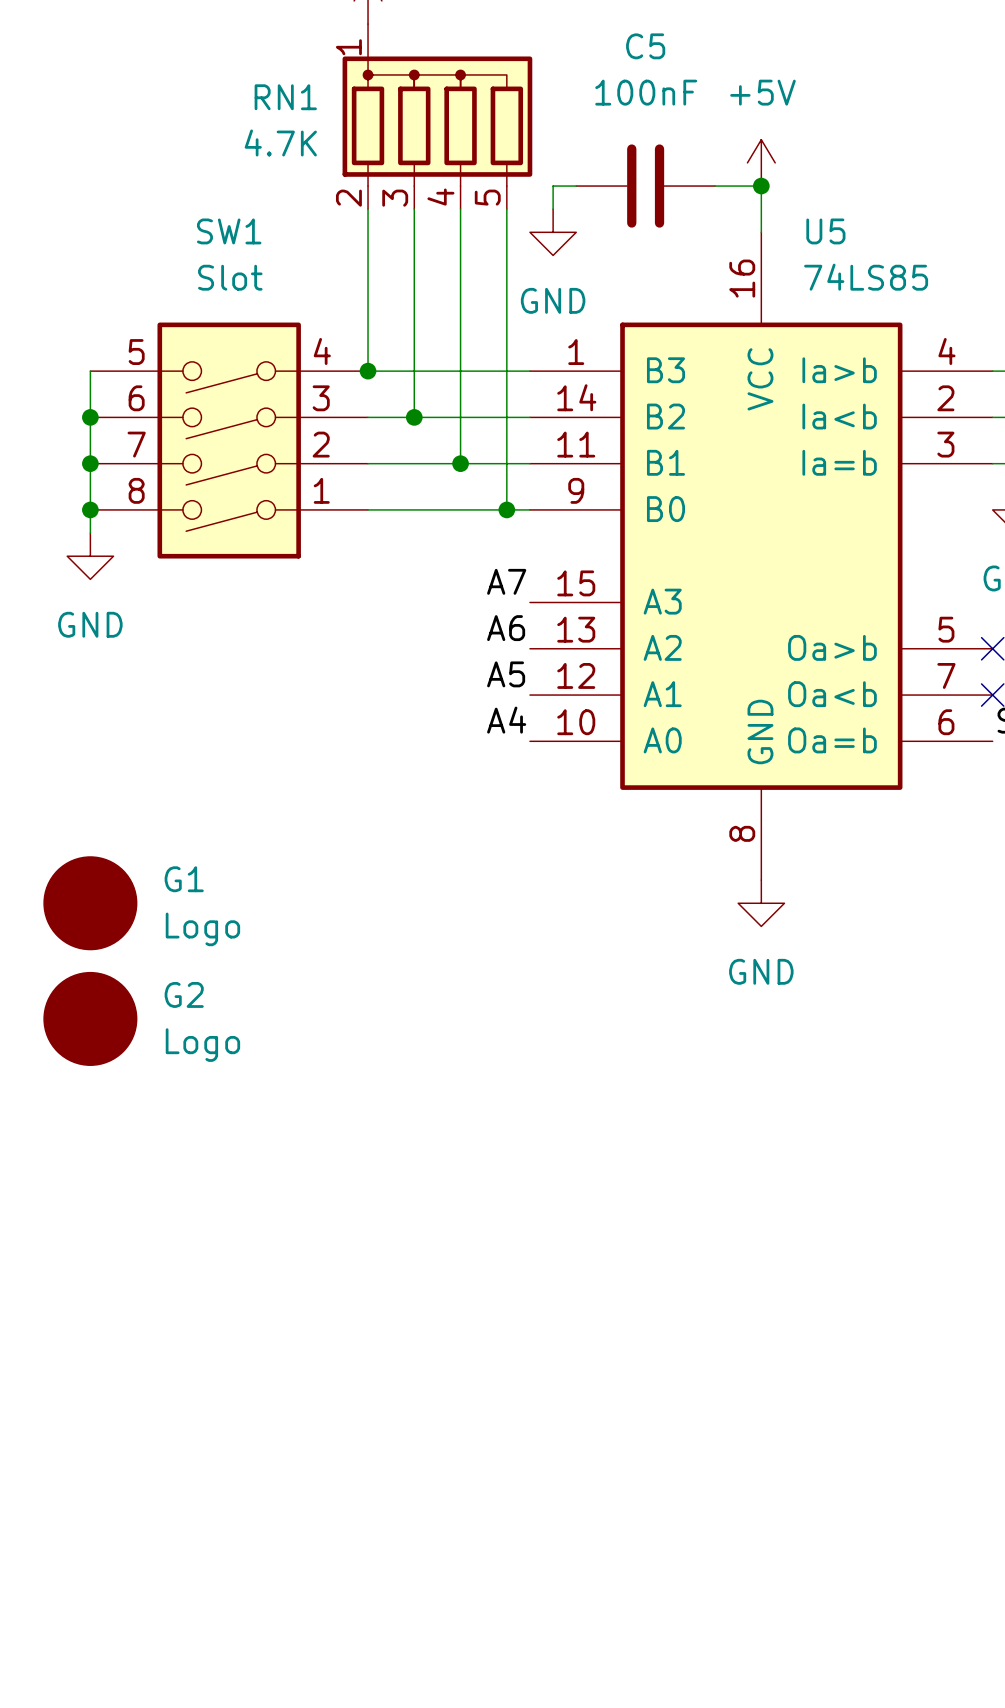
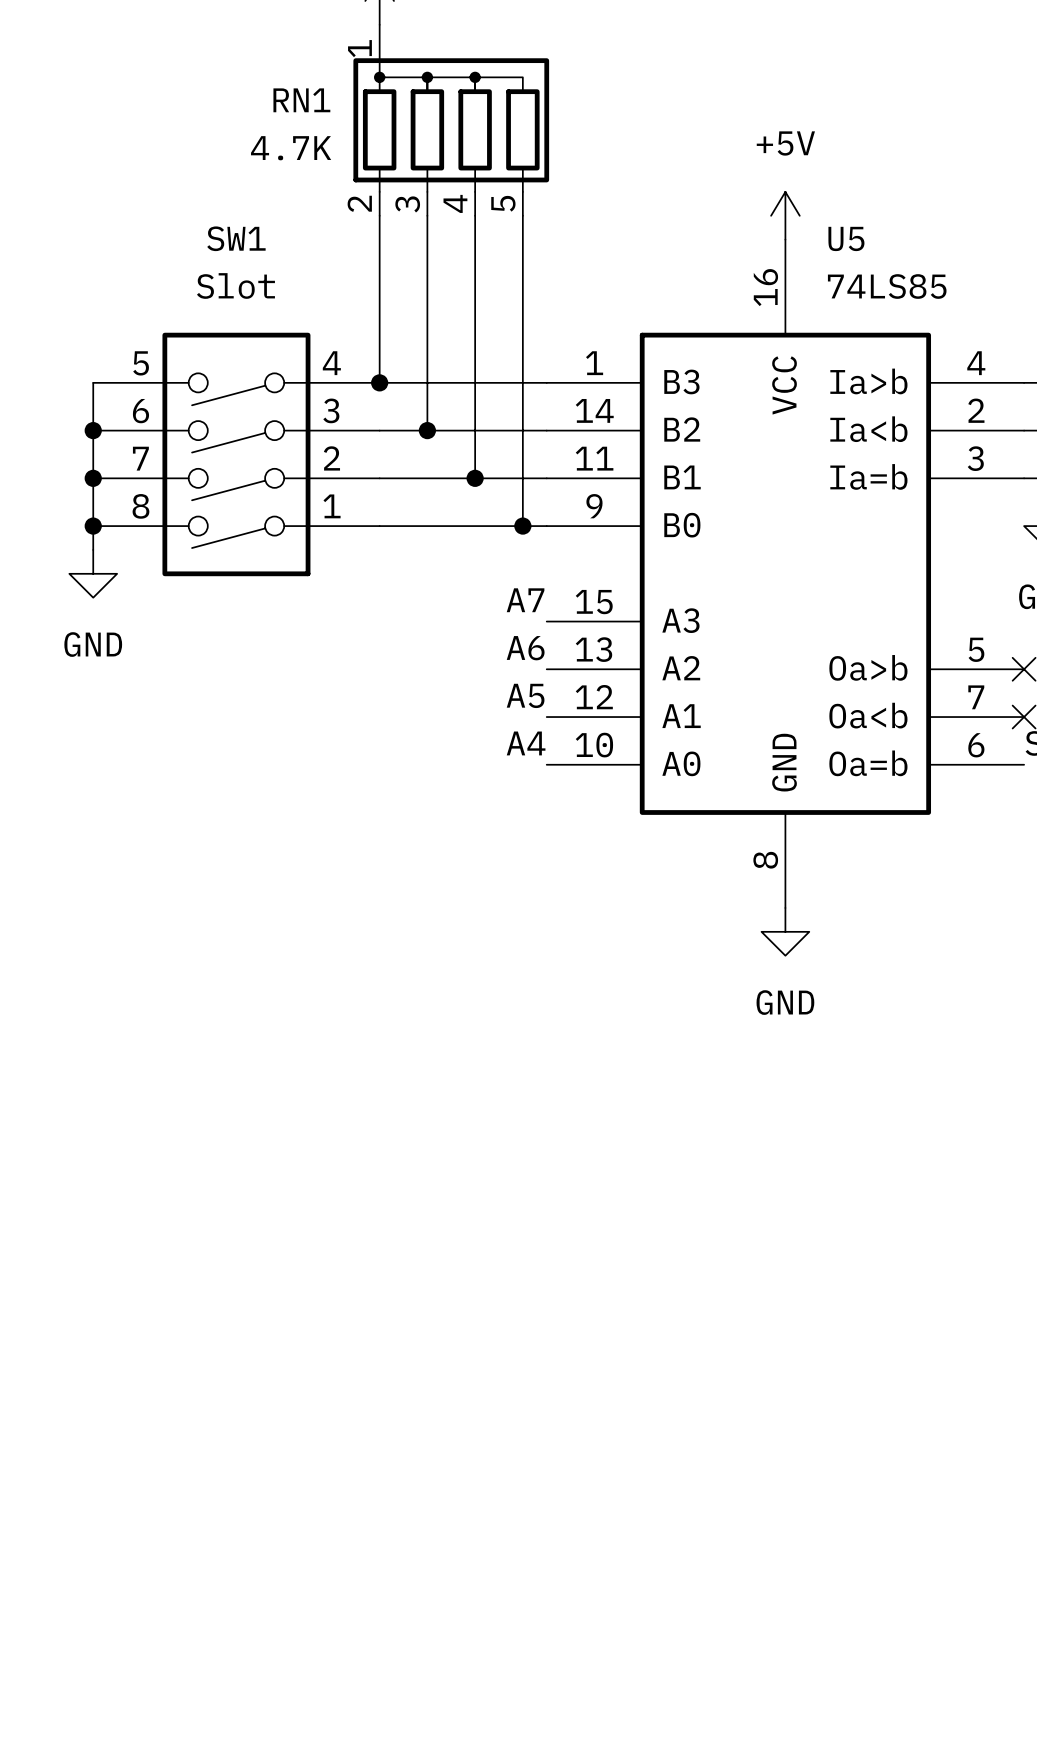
power symbol position: +5V (761, 162) -> +5V (785, 215)
wire: (576, 186) (553, 186) (553, 209) -> none
C5: 100nF (645, 186) -> none
wire: (715, 186) (761, 186) (761, 232) -> none
junction: (761, 186) -> none
power symbol: GND (553, 232) -> none
G1: Logo (90, 903) -> none
G2: Logo (90, 1018) -> none

